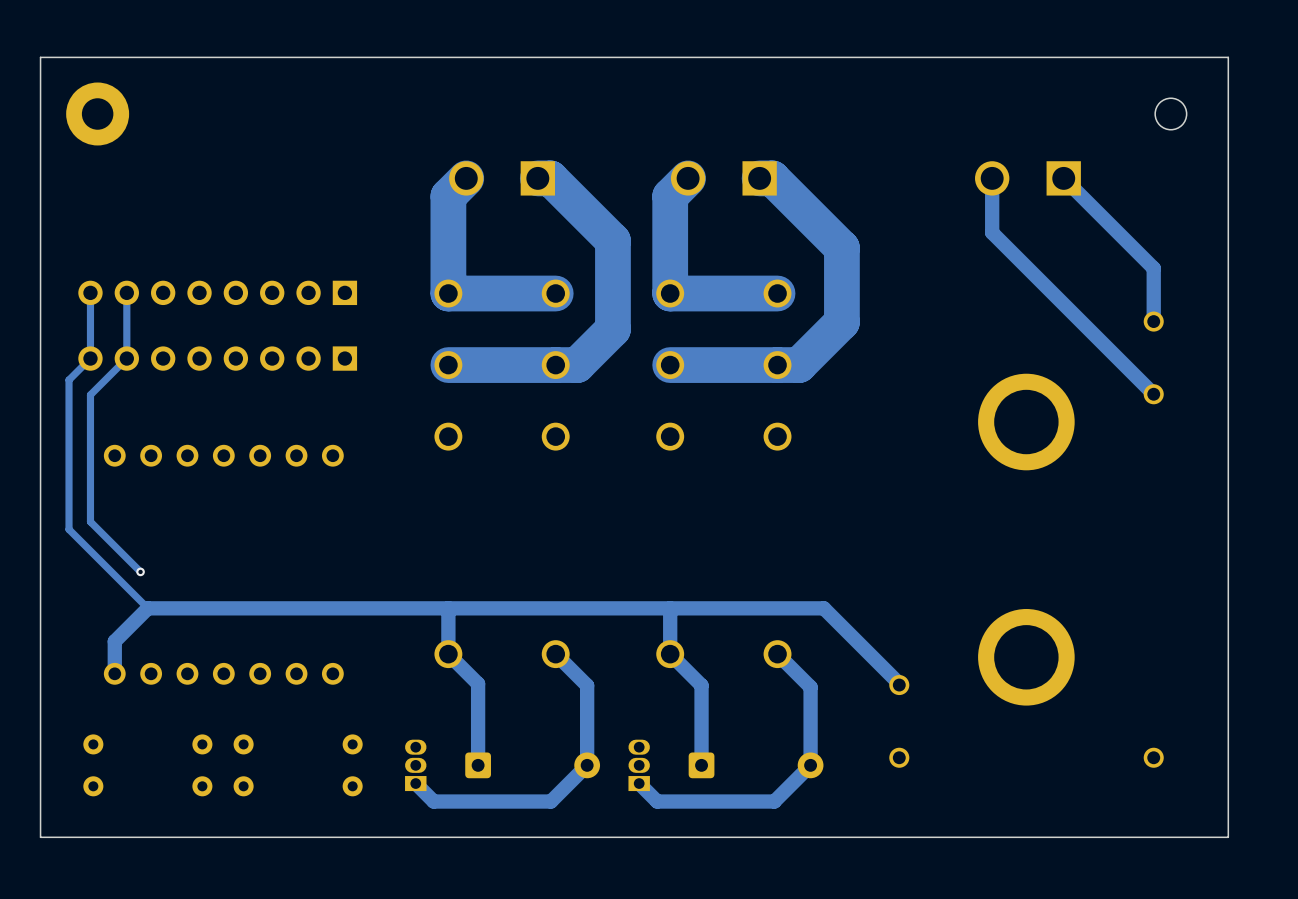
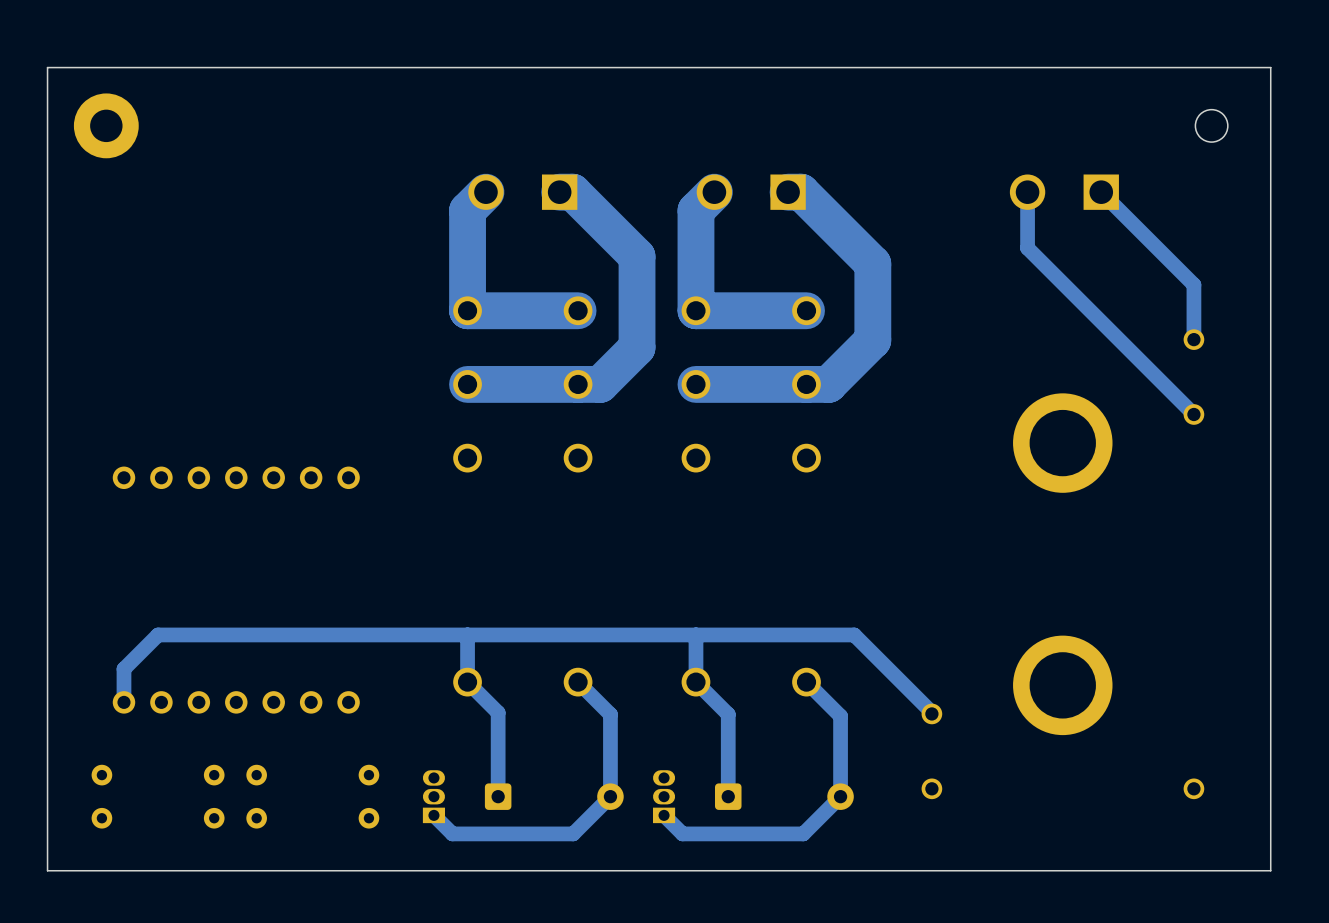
track: (90, 292) (90, 358) (69, 380) (69, 529) (147, 608) -> none
track: (126, 292) (126, 358) (90, 394) (90, 521) (140, 571) -> none
part: (217, 292) -> none
part: (217, 358) -> none
via: (140, 571) -> none

